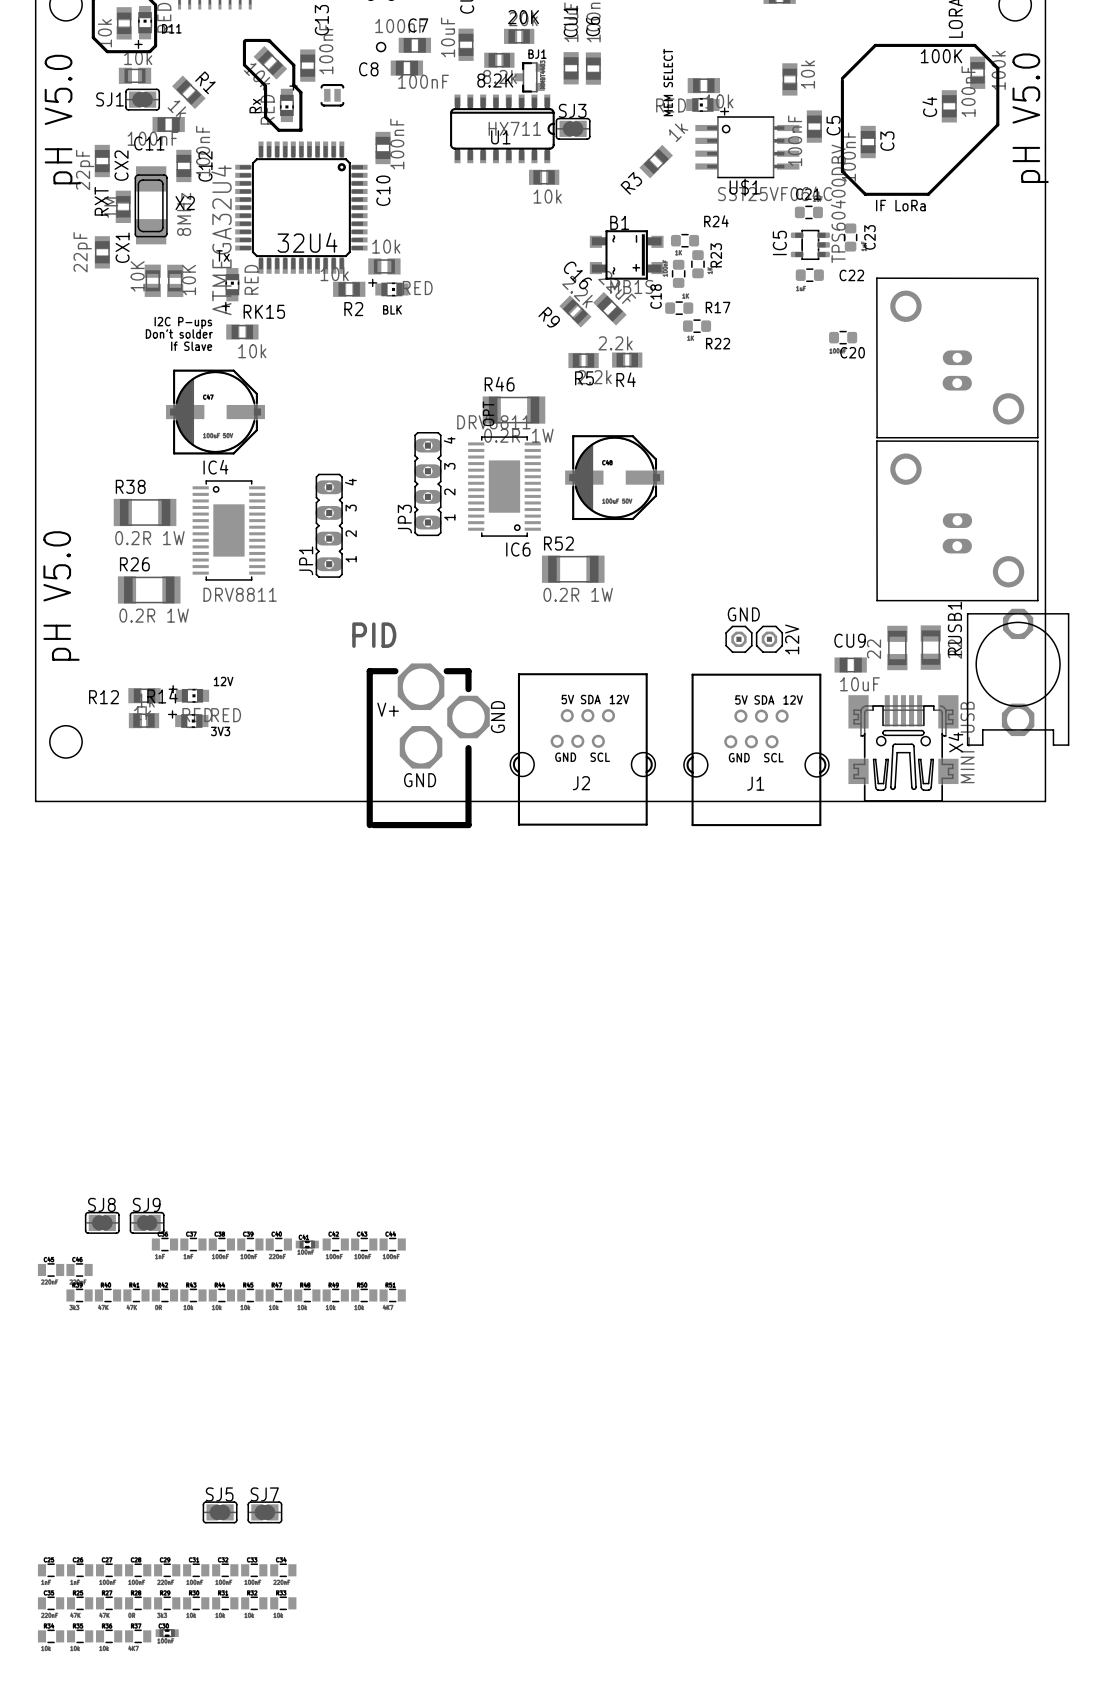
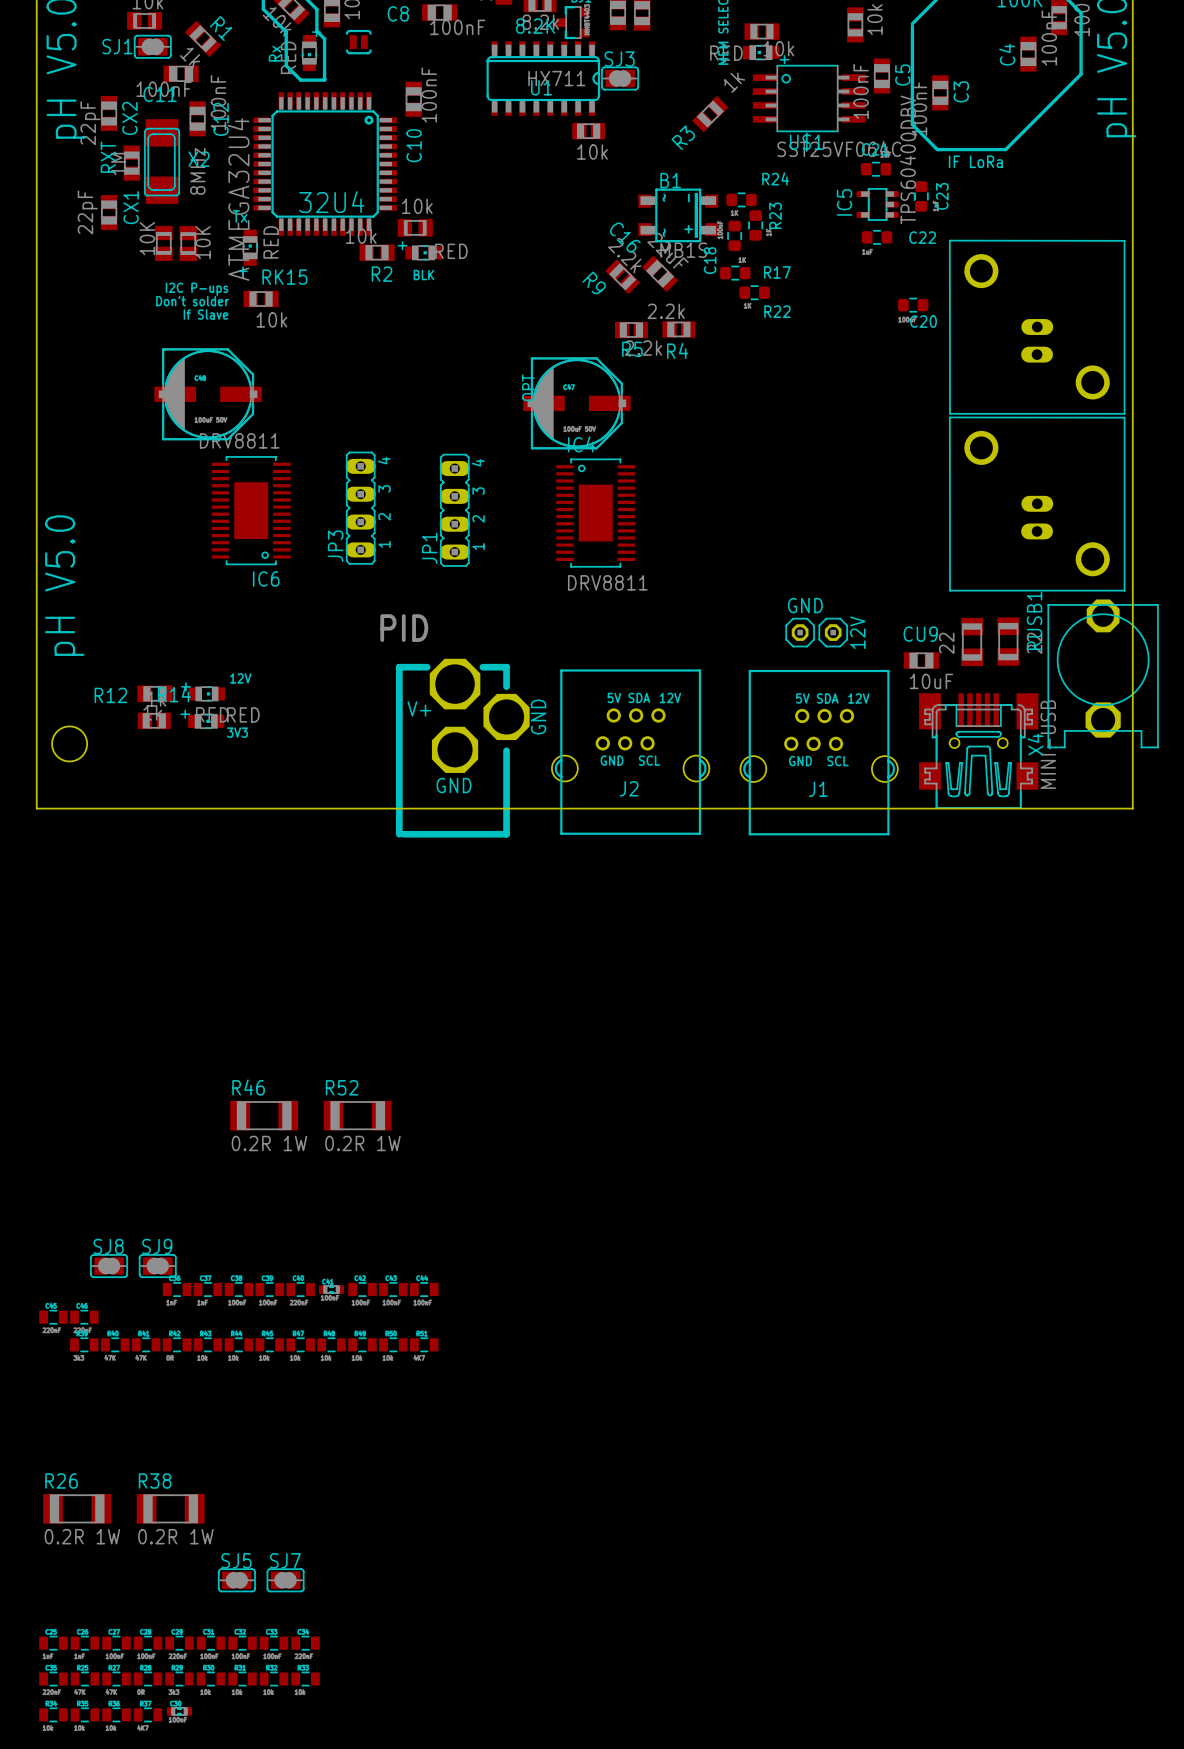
R46 position: (513, 410) -> (264, 1115)
part position: (215, 412) -> (576, 403)
part position: (614, 477) -> (208, 394)
JP3 position: (427, 484) -> (360, 508)
IC6 position: (504, 486) -> (251, 510)
R38 position: (145, 512) -> (170, 1508)
JP1 position: (329, 525) -> (454, 510)
IC4 position: (228, 530) -> (595, 513)
R52 position: (573, 569) -> (357, 1115)
R26 position: (149, 589) -> (77, 1508)

